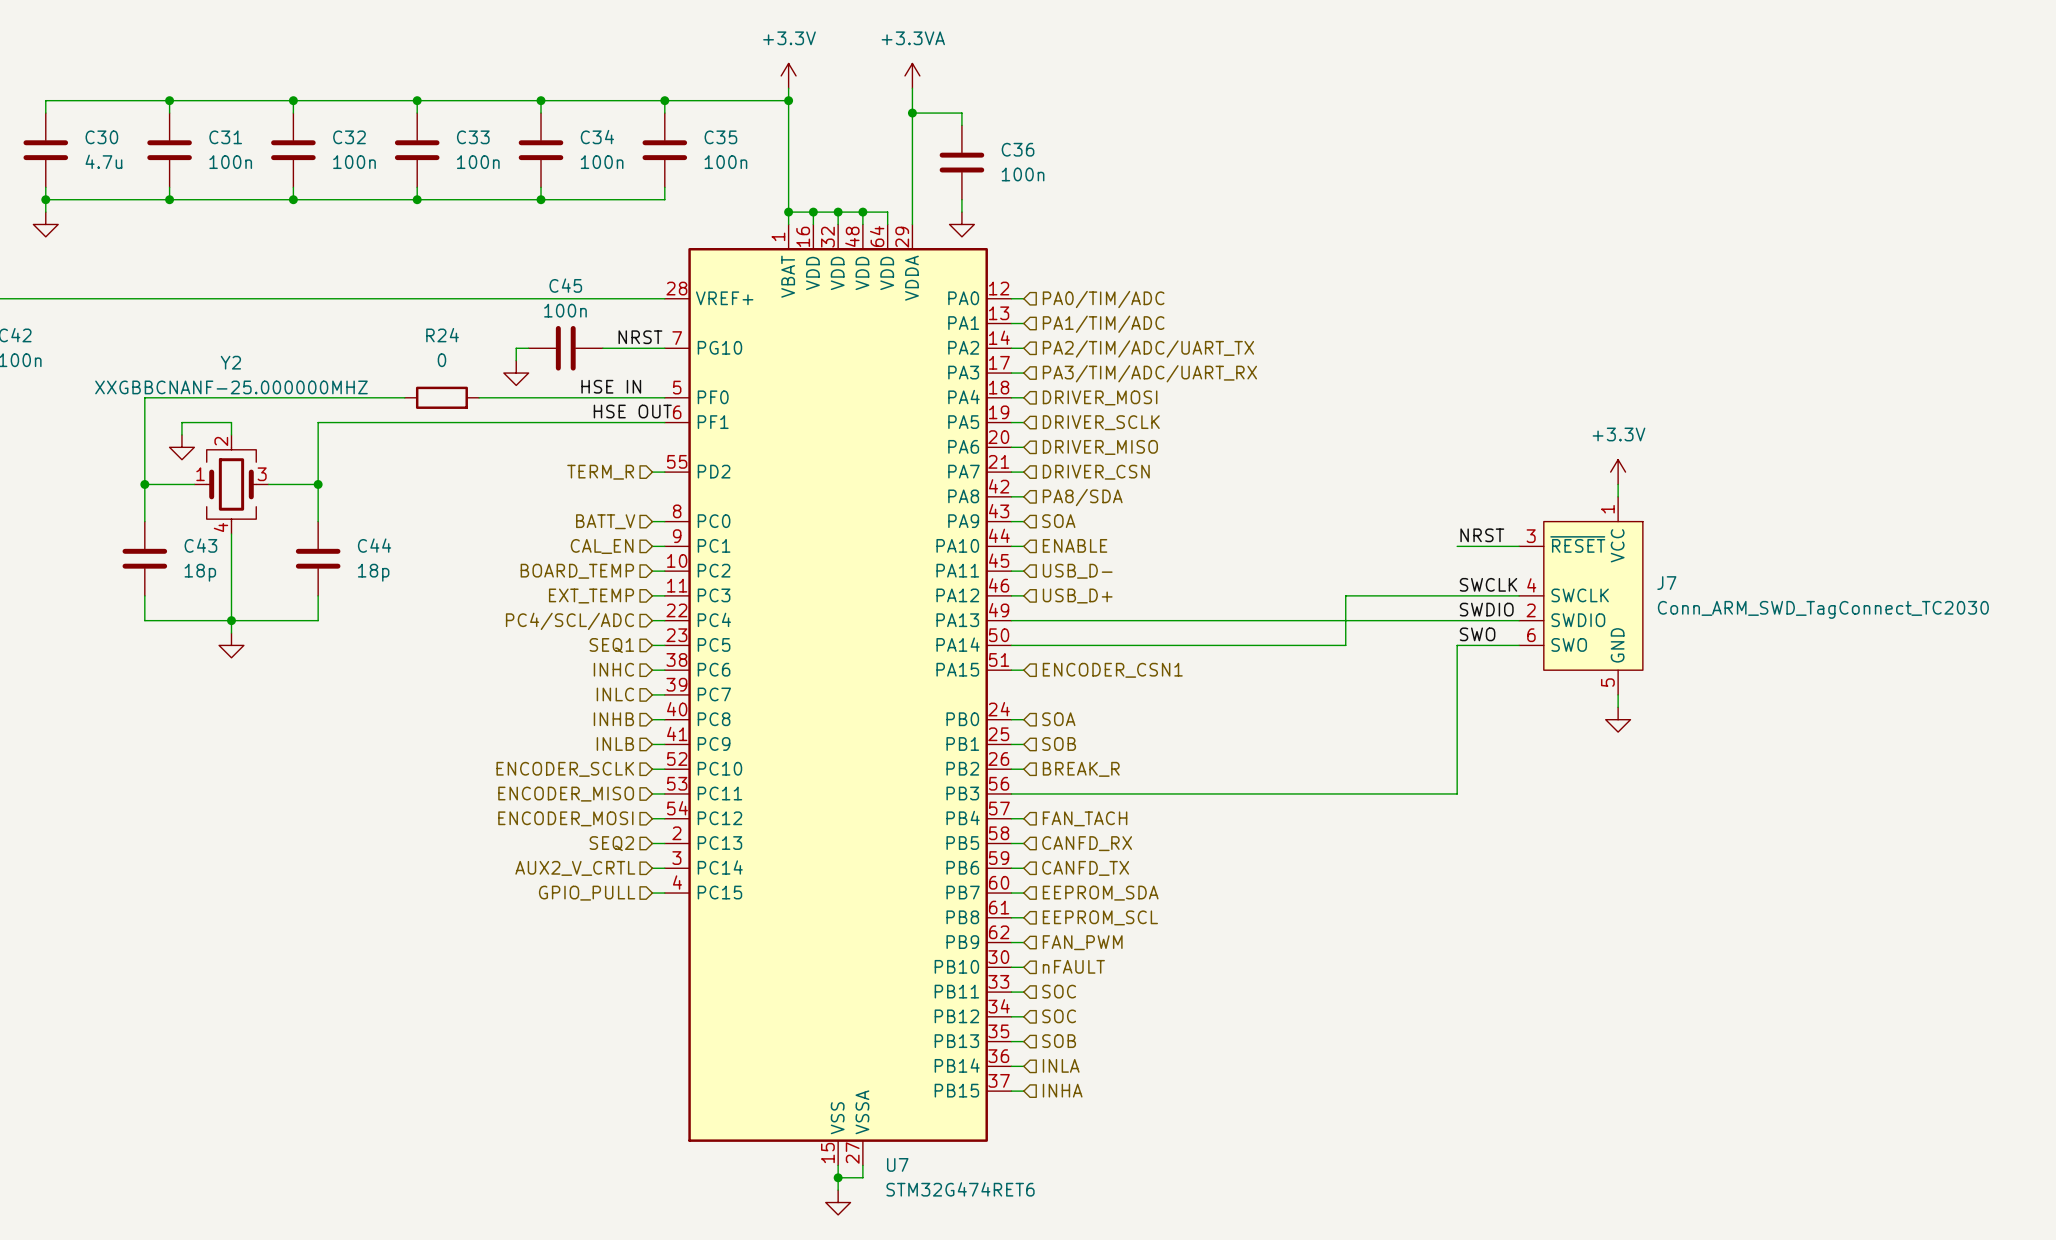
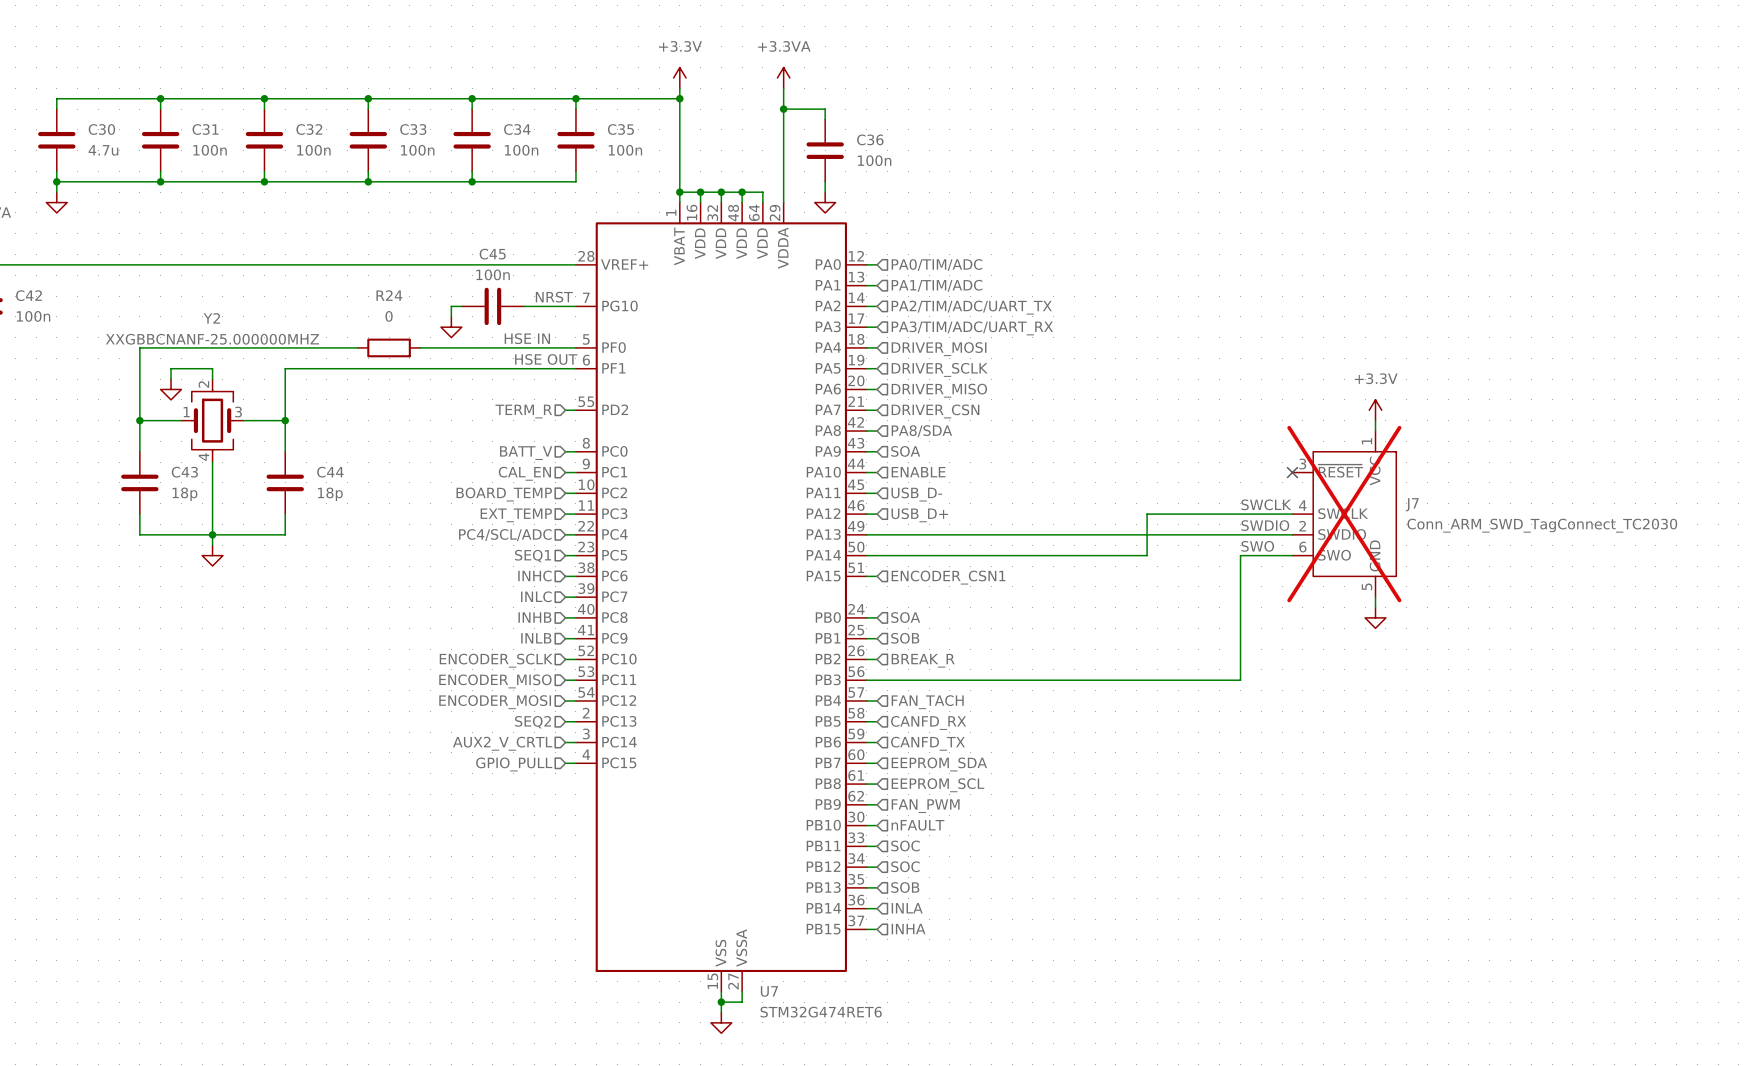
label: NRST (1482, 535) -> none
wire: (1457, 546) (1519, 546) -> none
no-connect mark: none -> (1292, 472)
J7 do-not-place cross: none -> (1344, 514)

